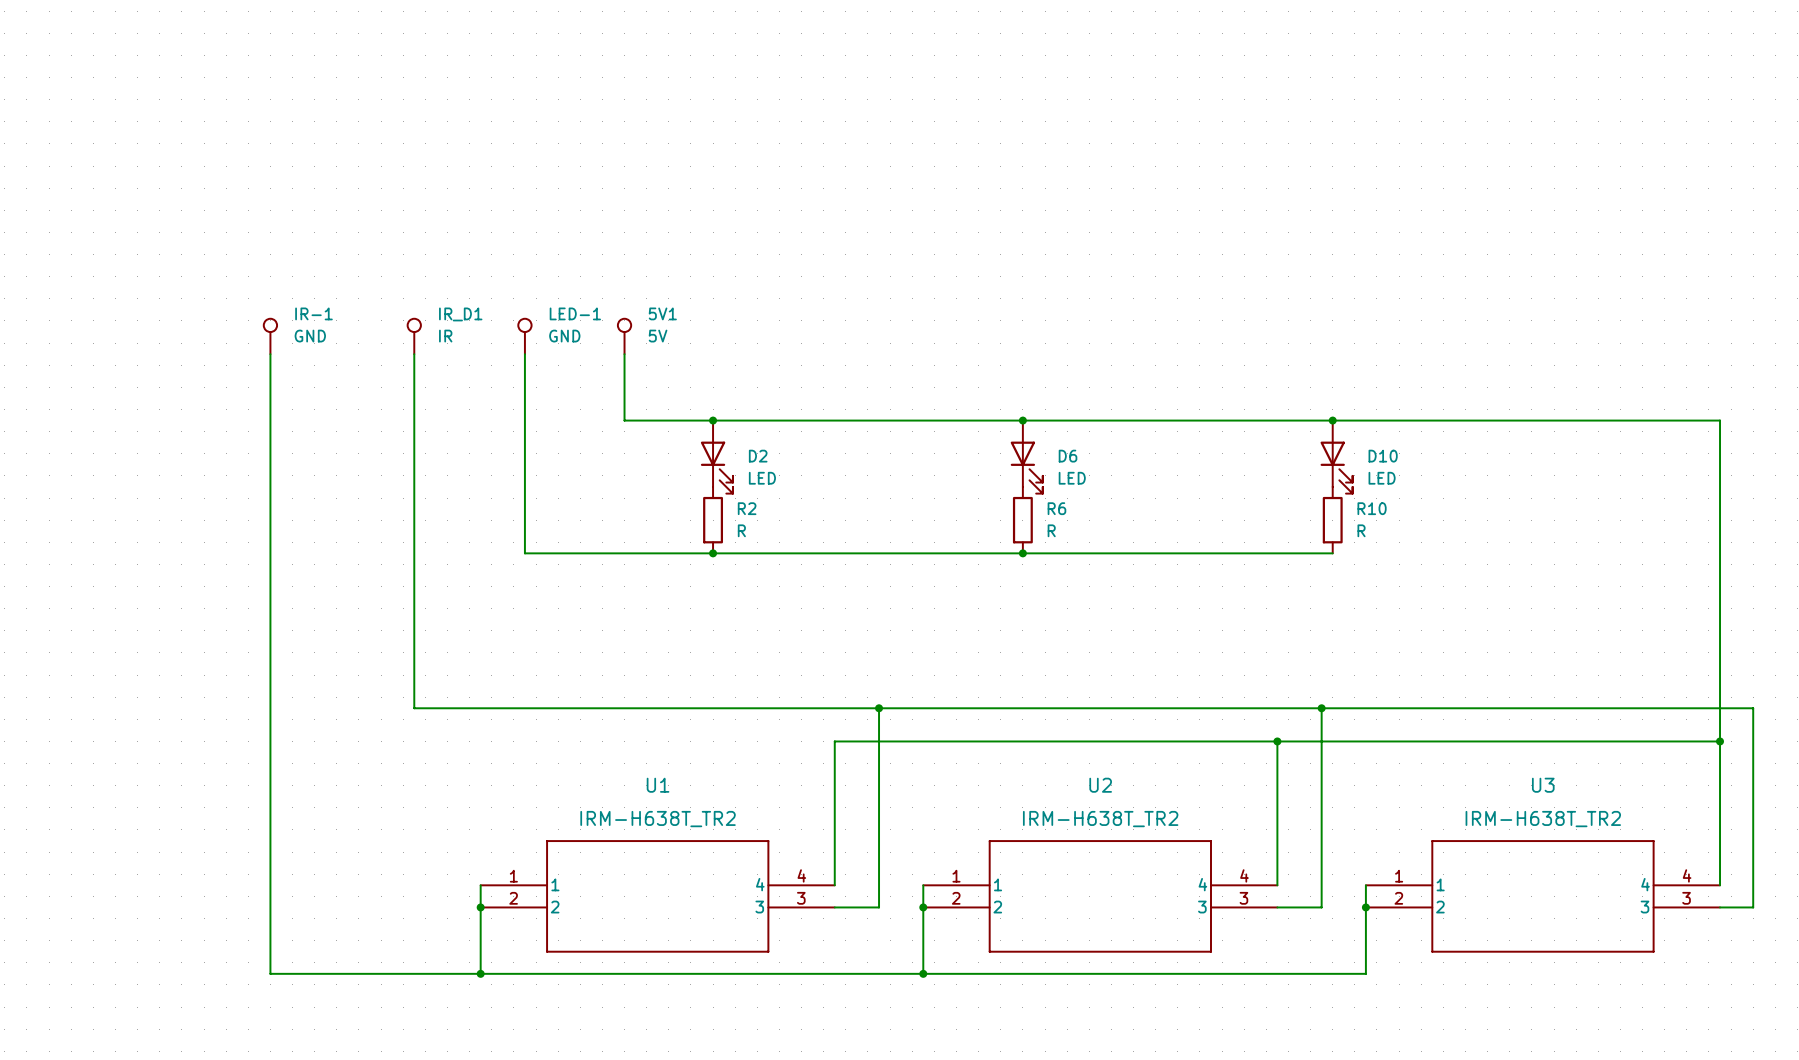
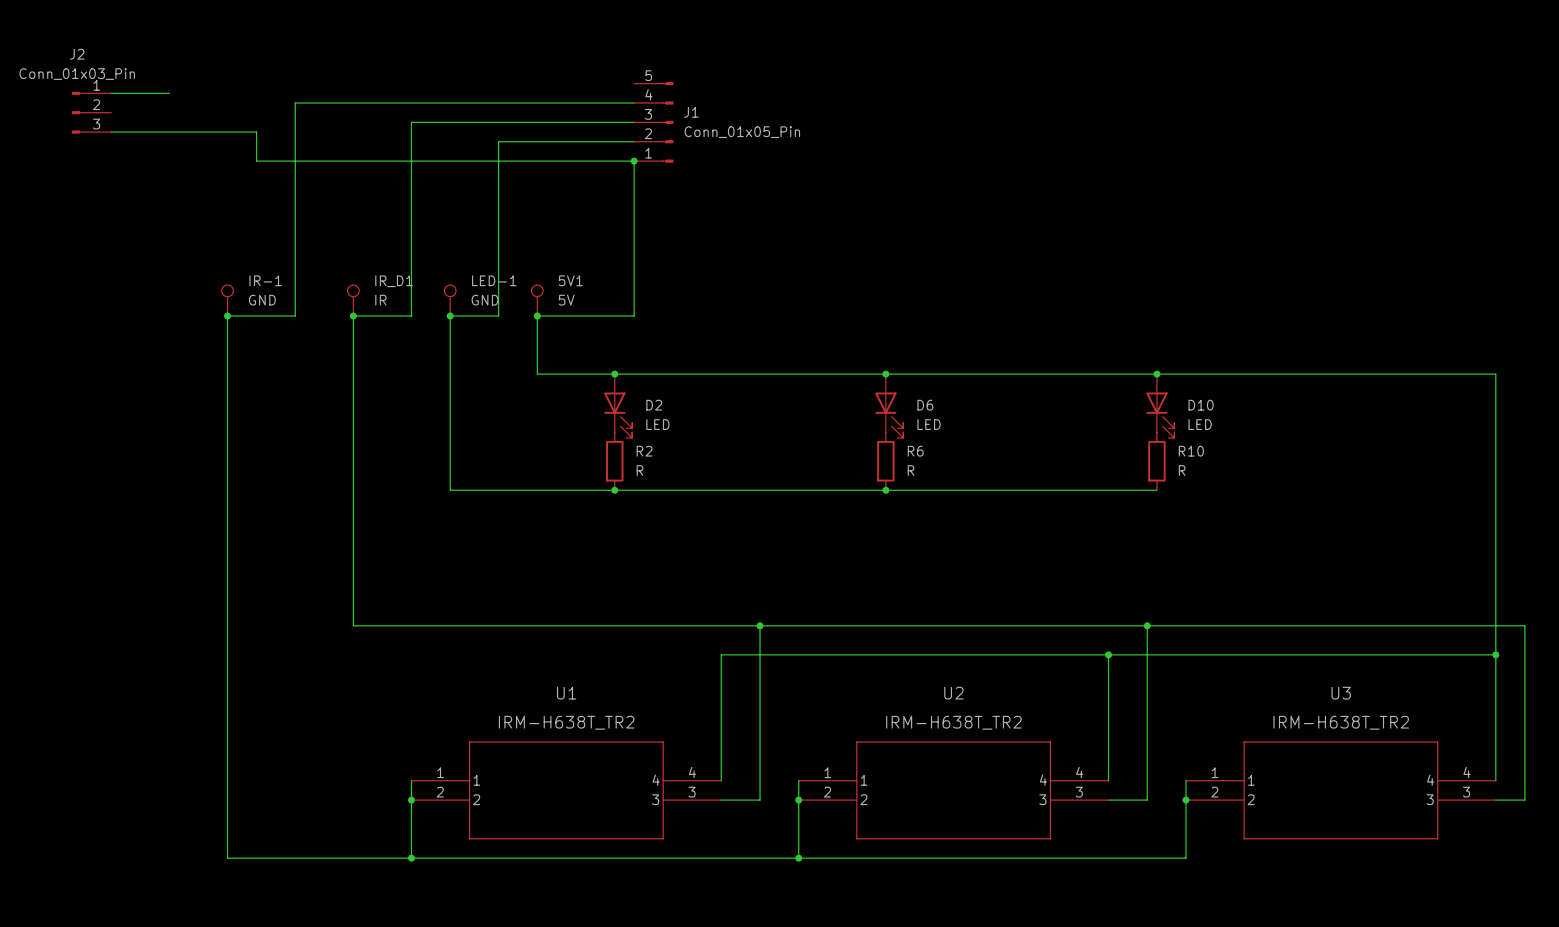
wire: none -> (111, 93) (169, 93)
wire: none -> (634, 103) (295, 103) (295, 316) (227, 316)
J2: none -> Conn_01x03_Pin (91, 112)
wire: none -> (634, 122) (411, 122) (411, 316) (353, 316)
J1: none -> Conn_01x05_Pin (653, 122)
wire: none -> (111, 132) (256, 132) (256, 161) (634, 161) (634, 316) (537, 316)
wire: none -> (634, 141) (498, 141) (498, 316) (450, 316)
junction: none -> (634, 161)
junction: none -> (227, 316)
junction: none -> (353, 316)
junction: none -> (450, 316)
junction: none -> (537, 316)

